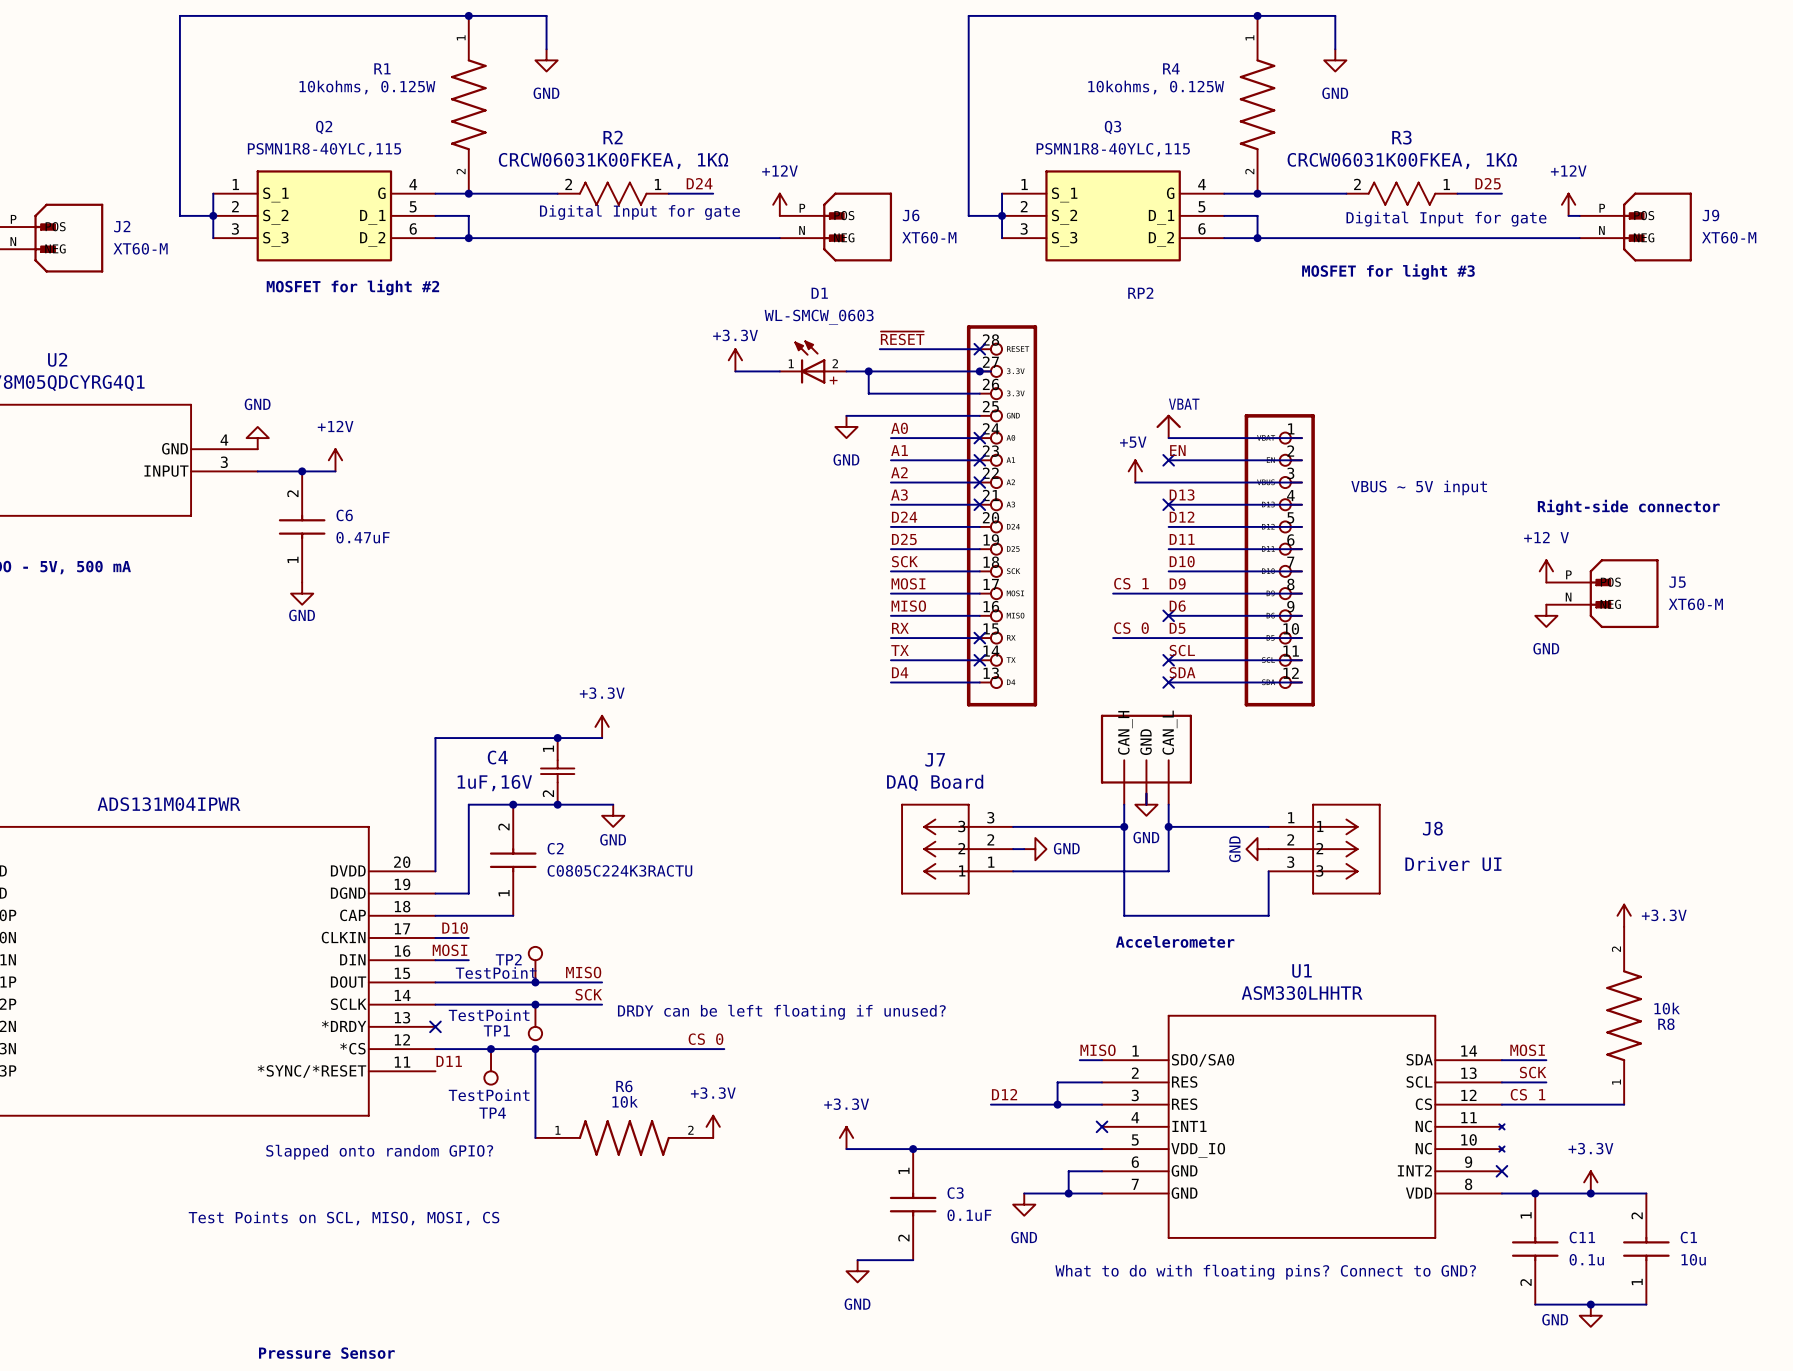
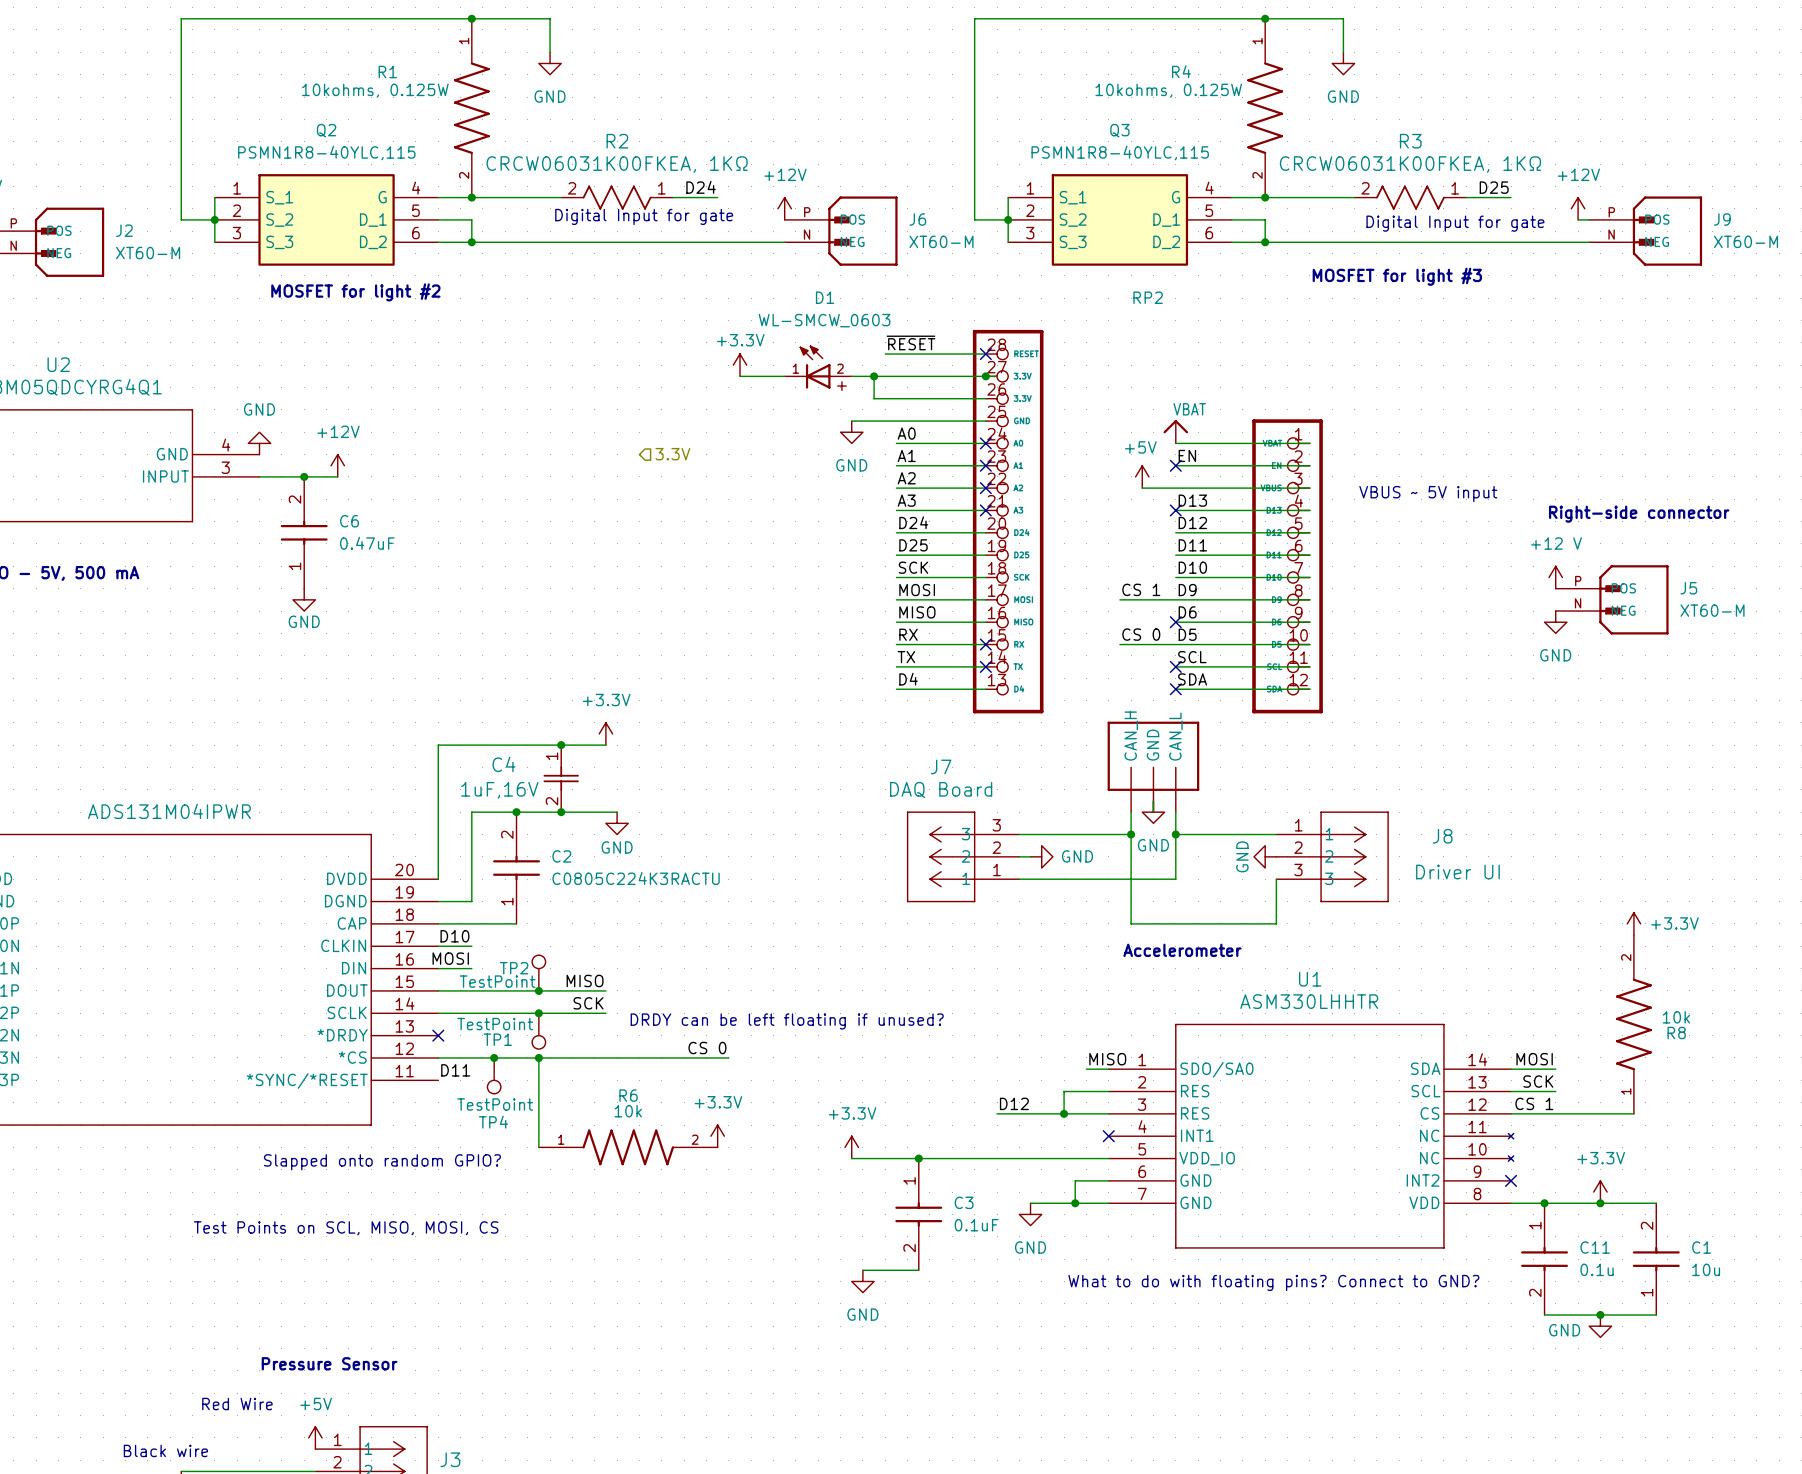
hierarchical label: none -> 3.3V (672, 454)

